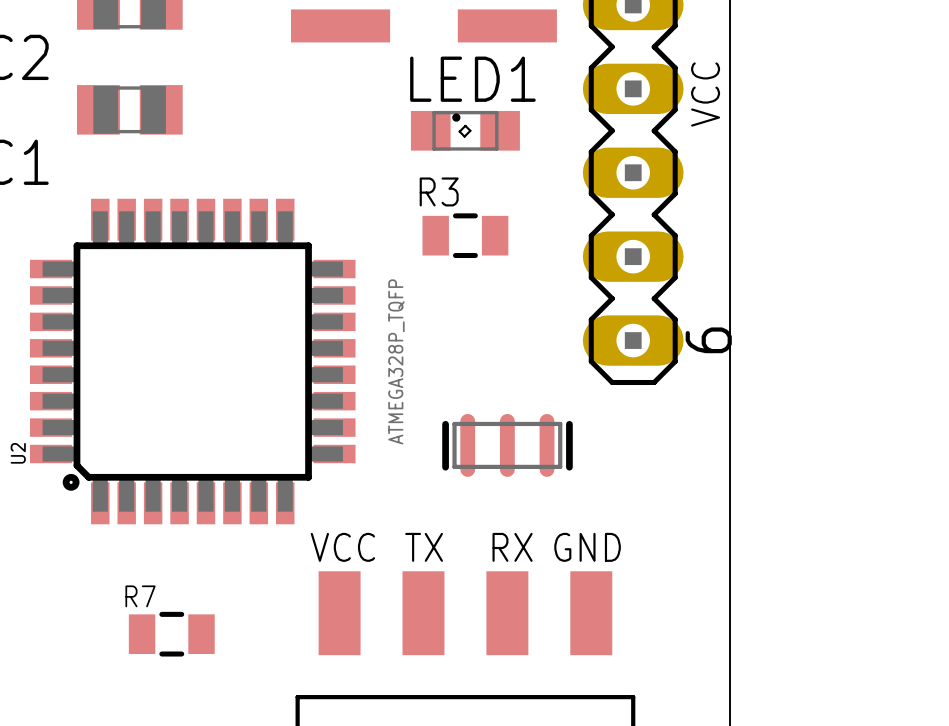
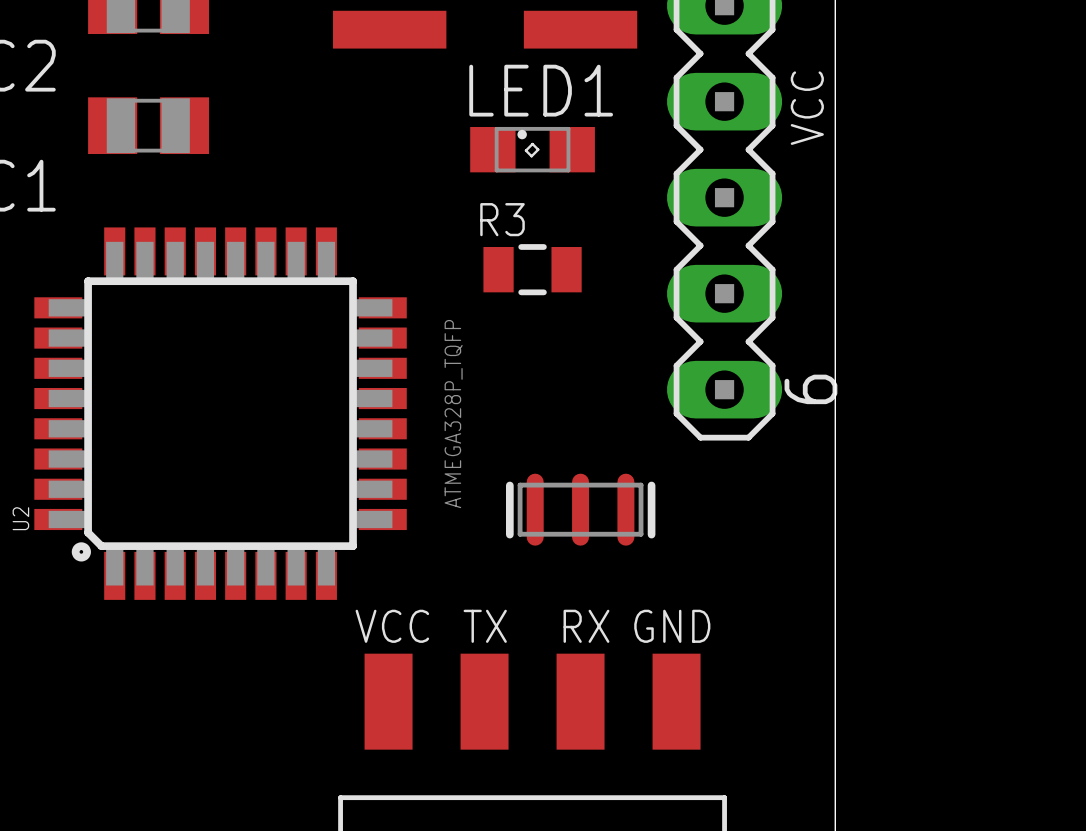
R7: (171, 634) -> none

